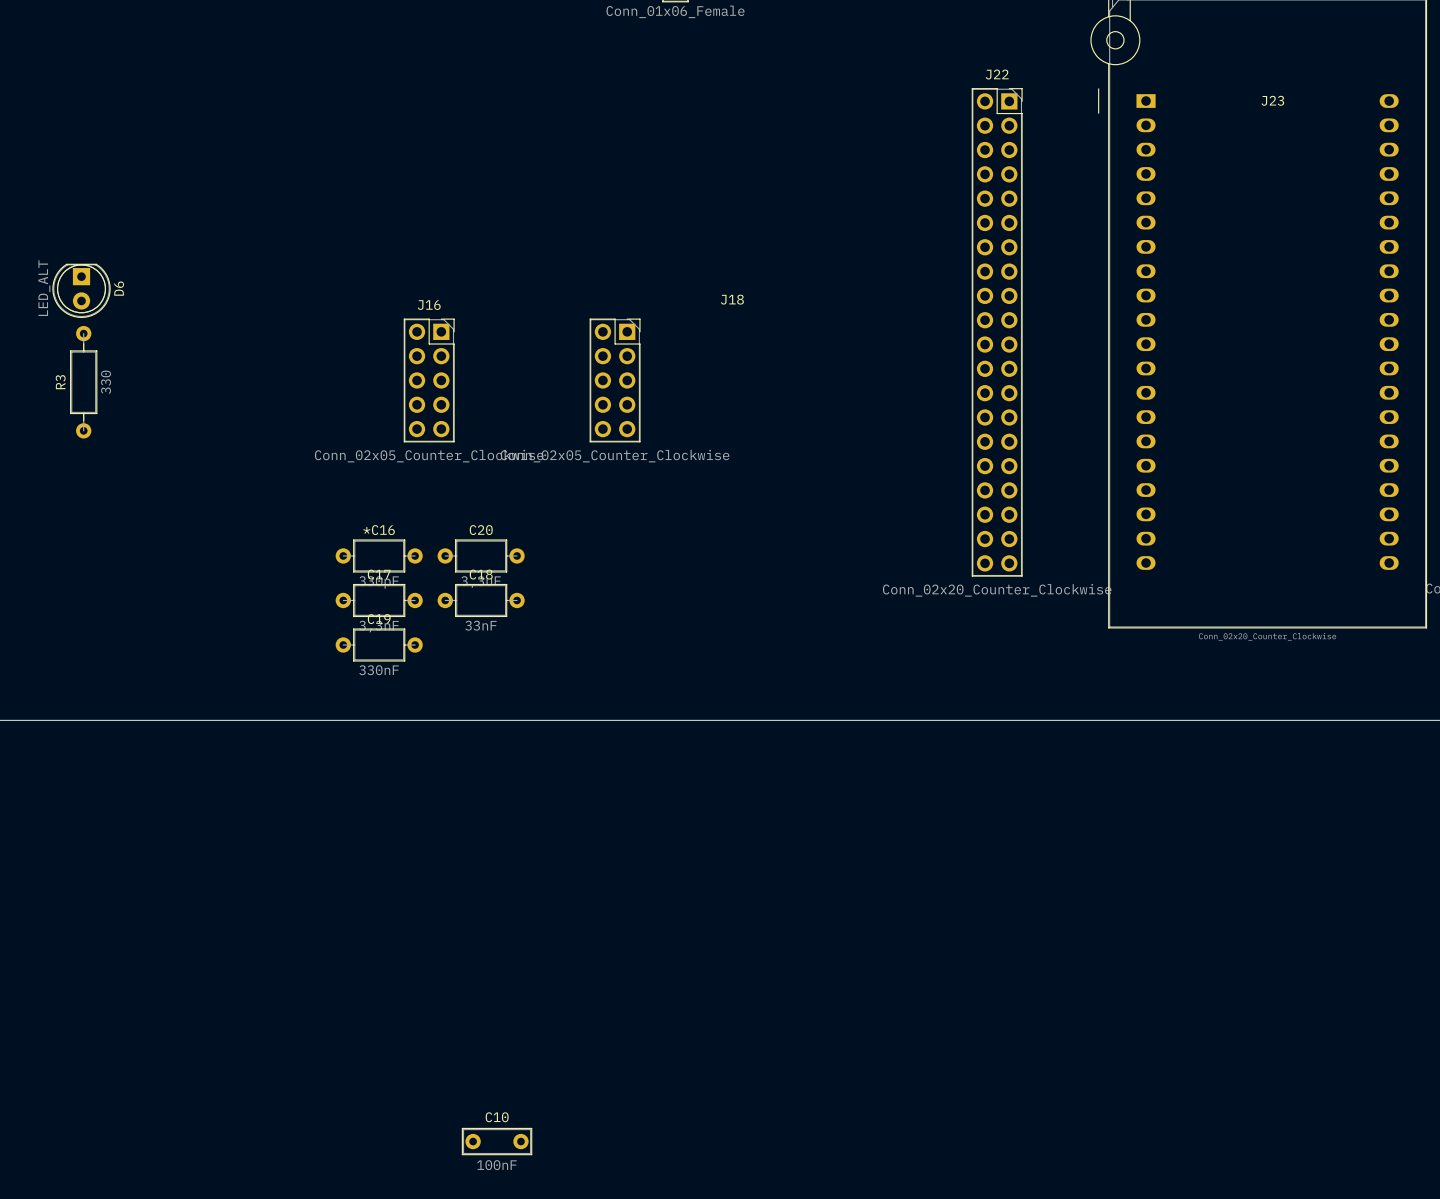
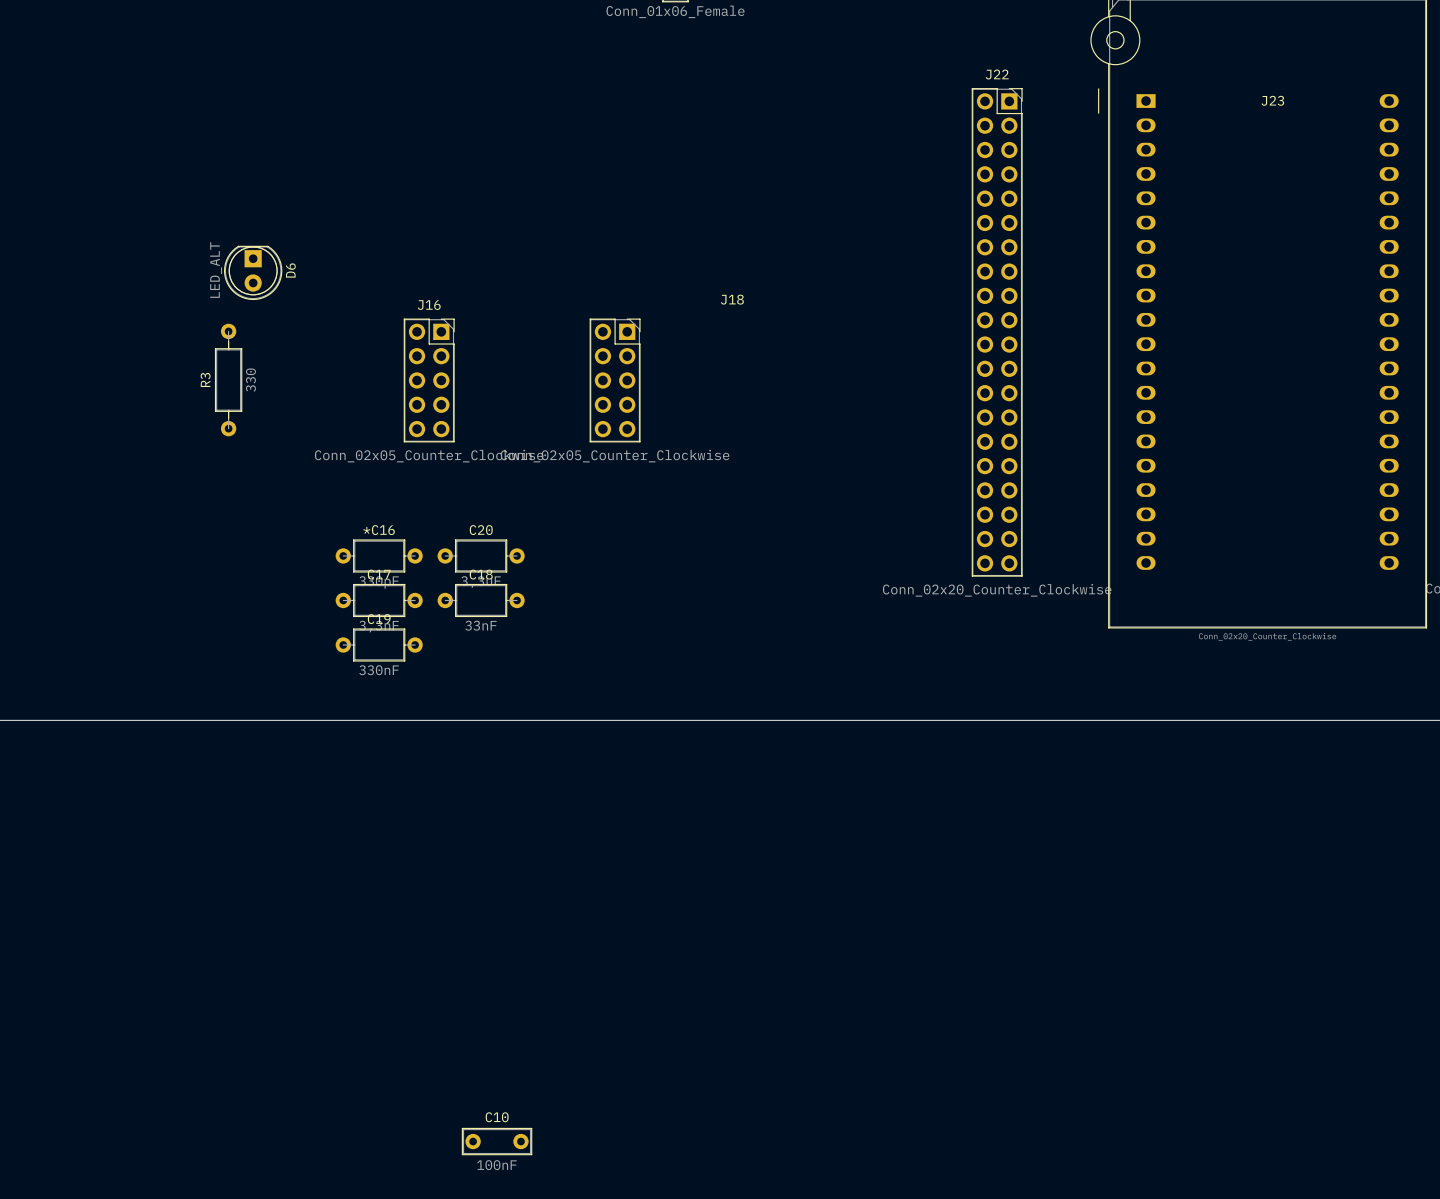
D6 position: (81, 290) -> (253, 272)
R3 position: (83, 382) -> (228, 380)

